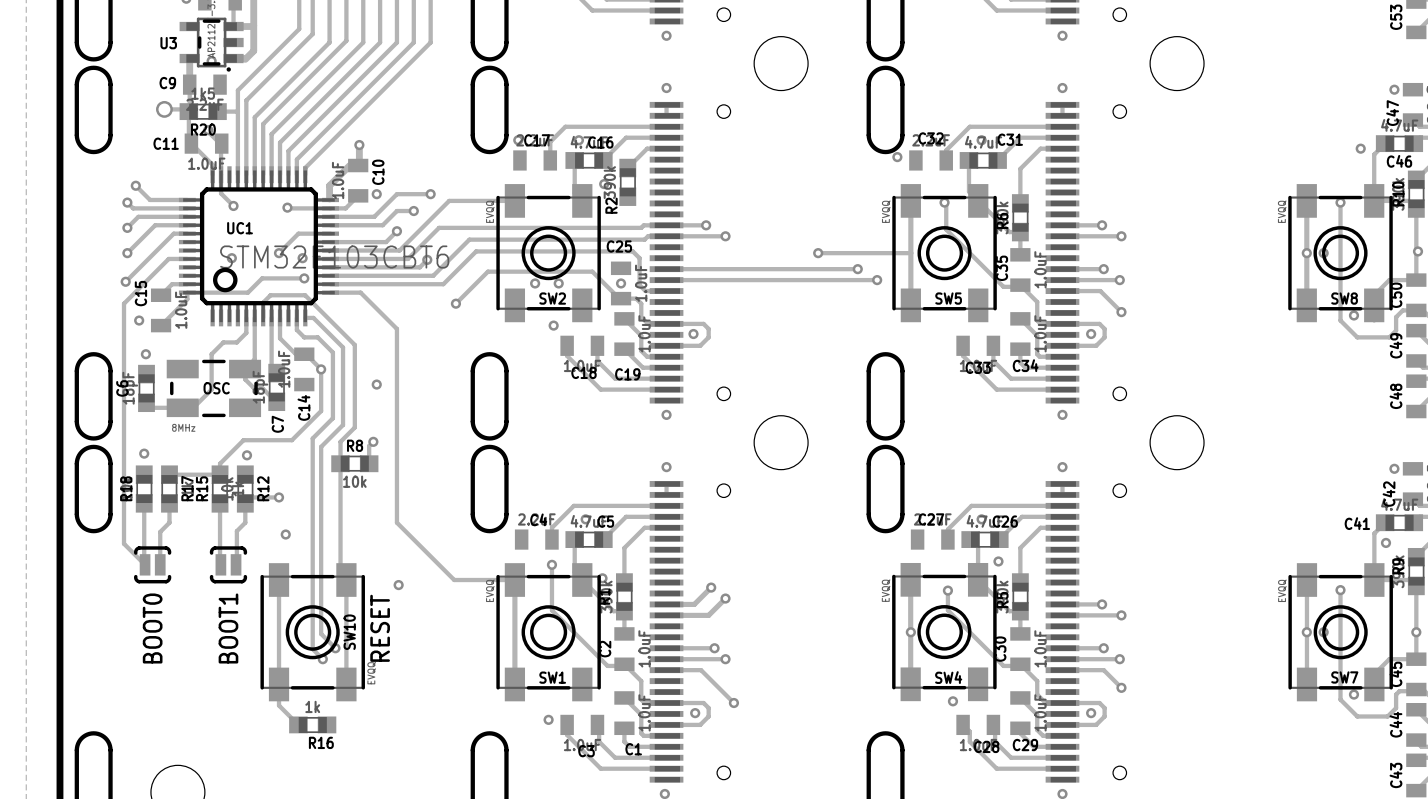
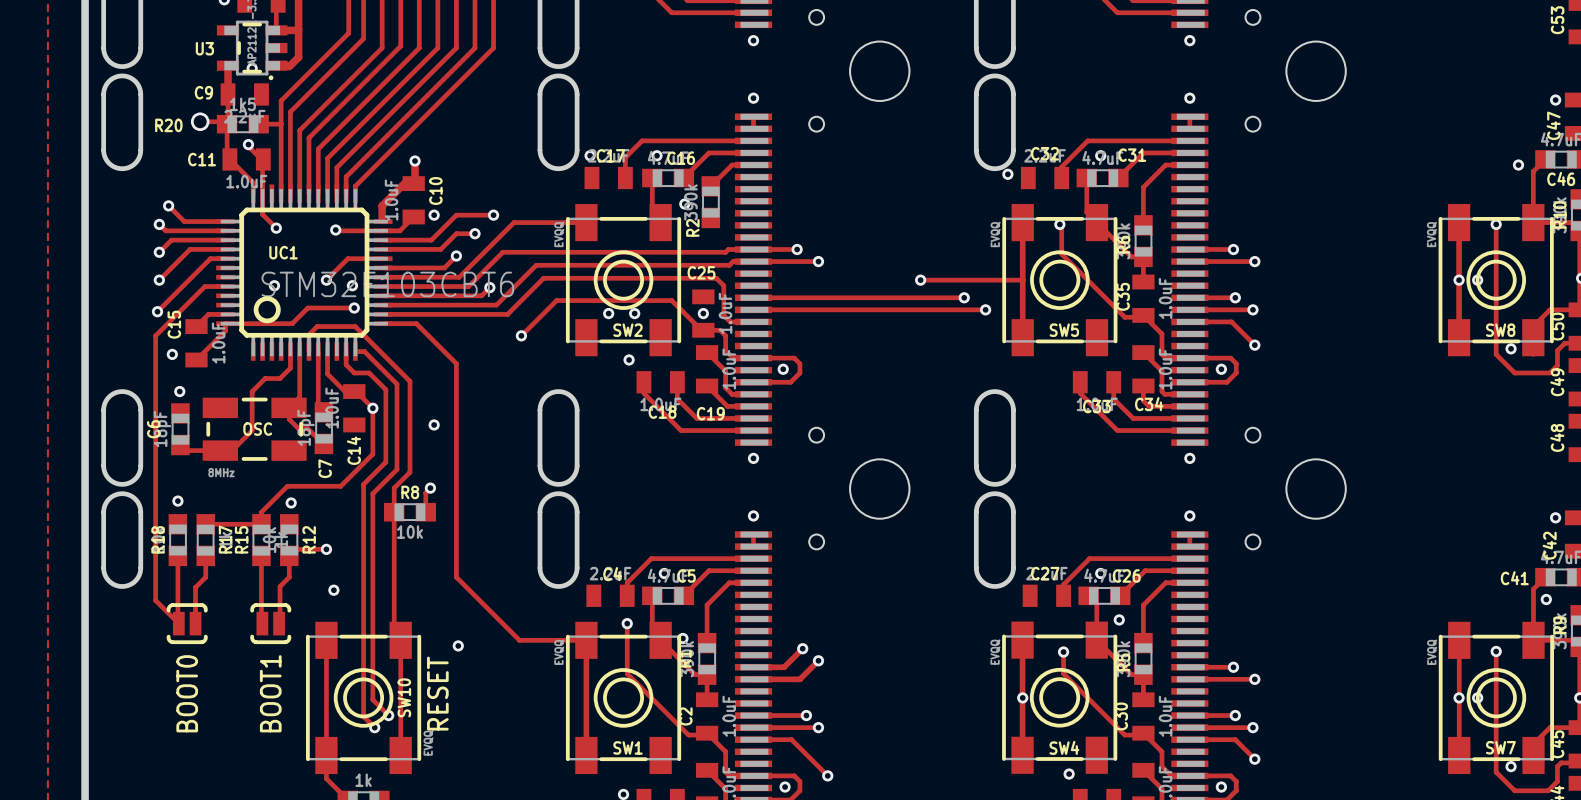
R20 name position: R20 (203, 129) -> R20 (168, 125)

